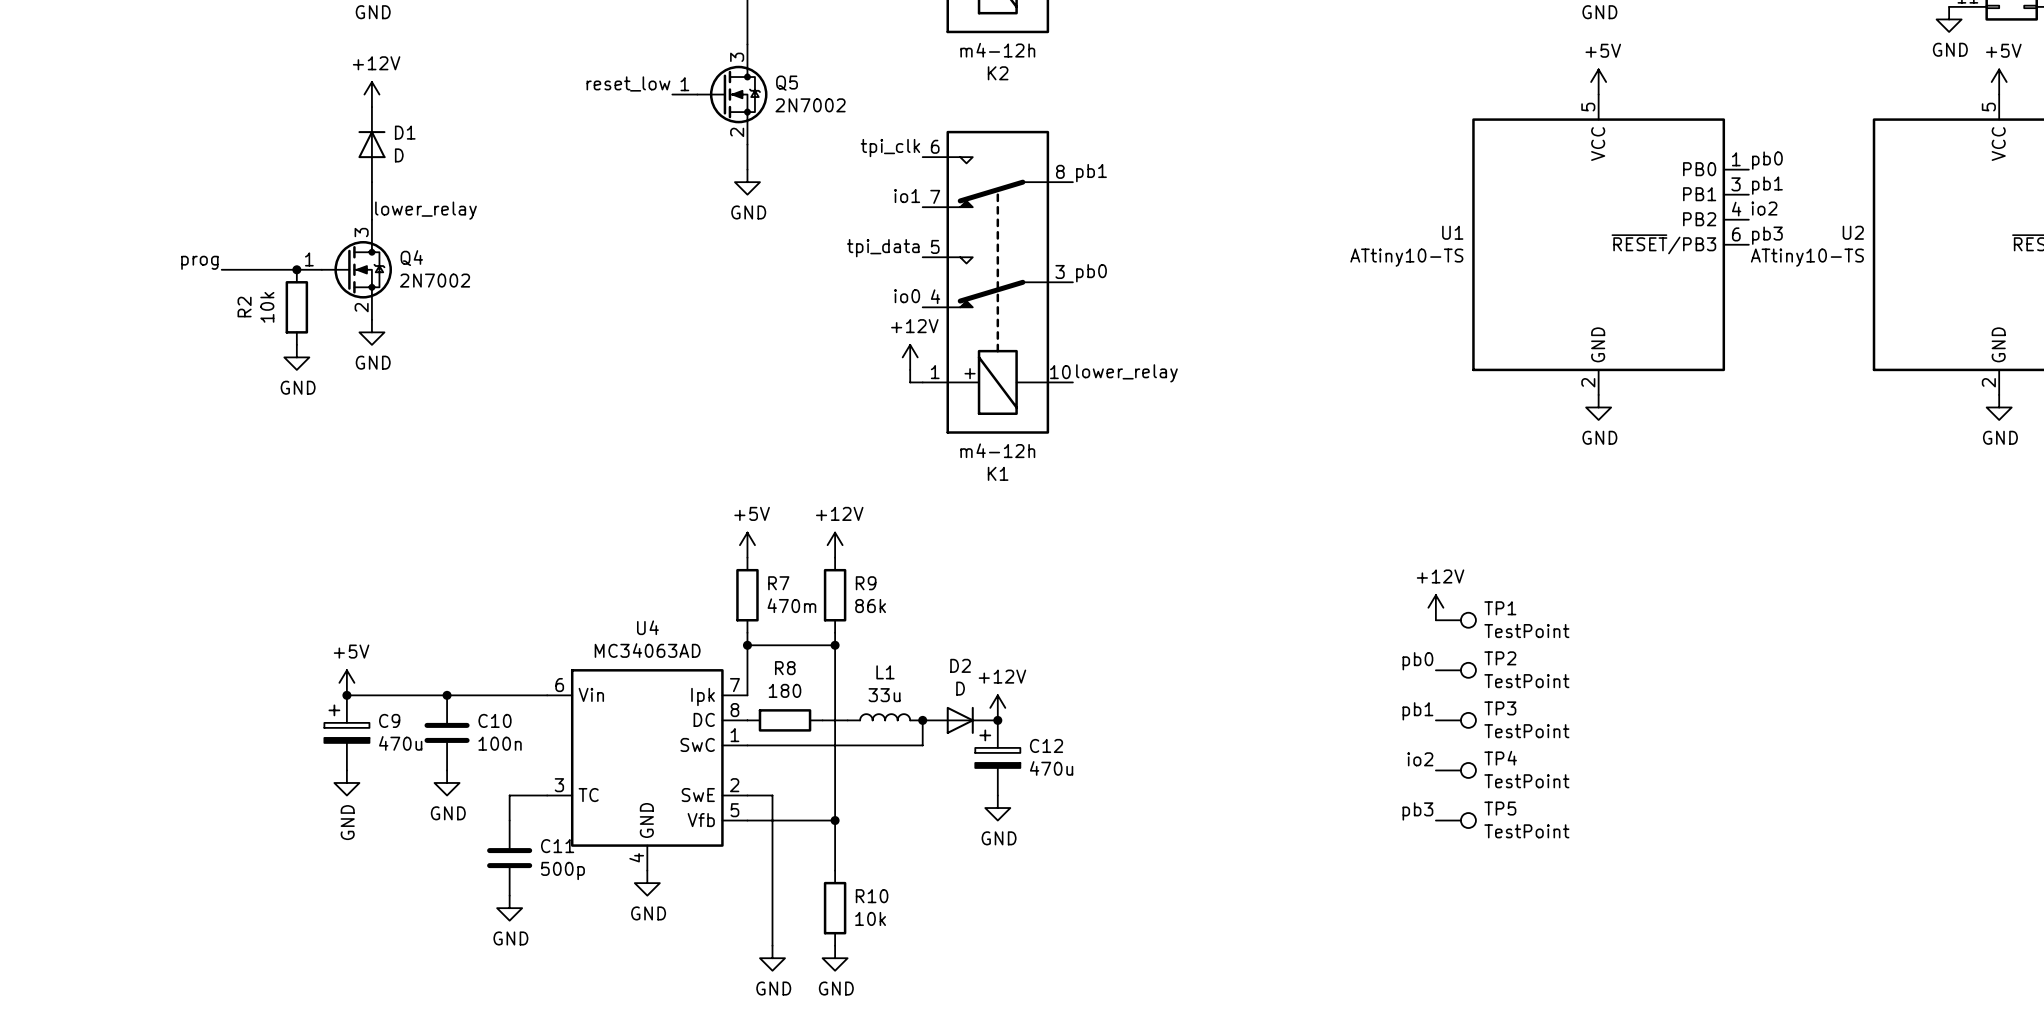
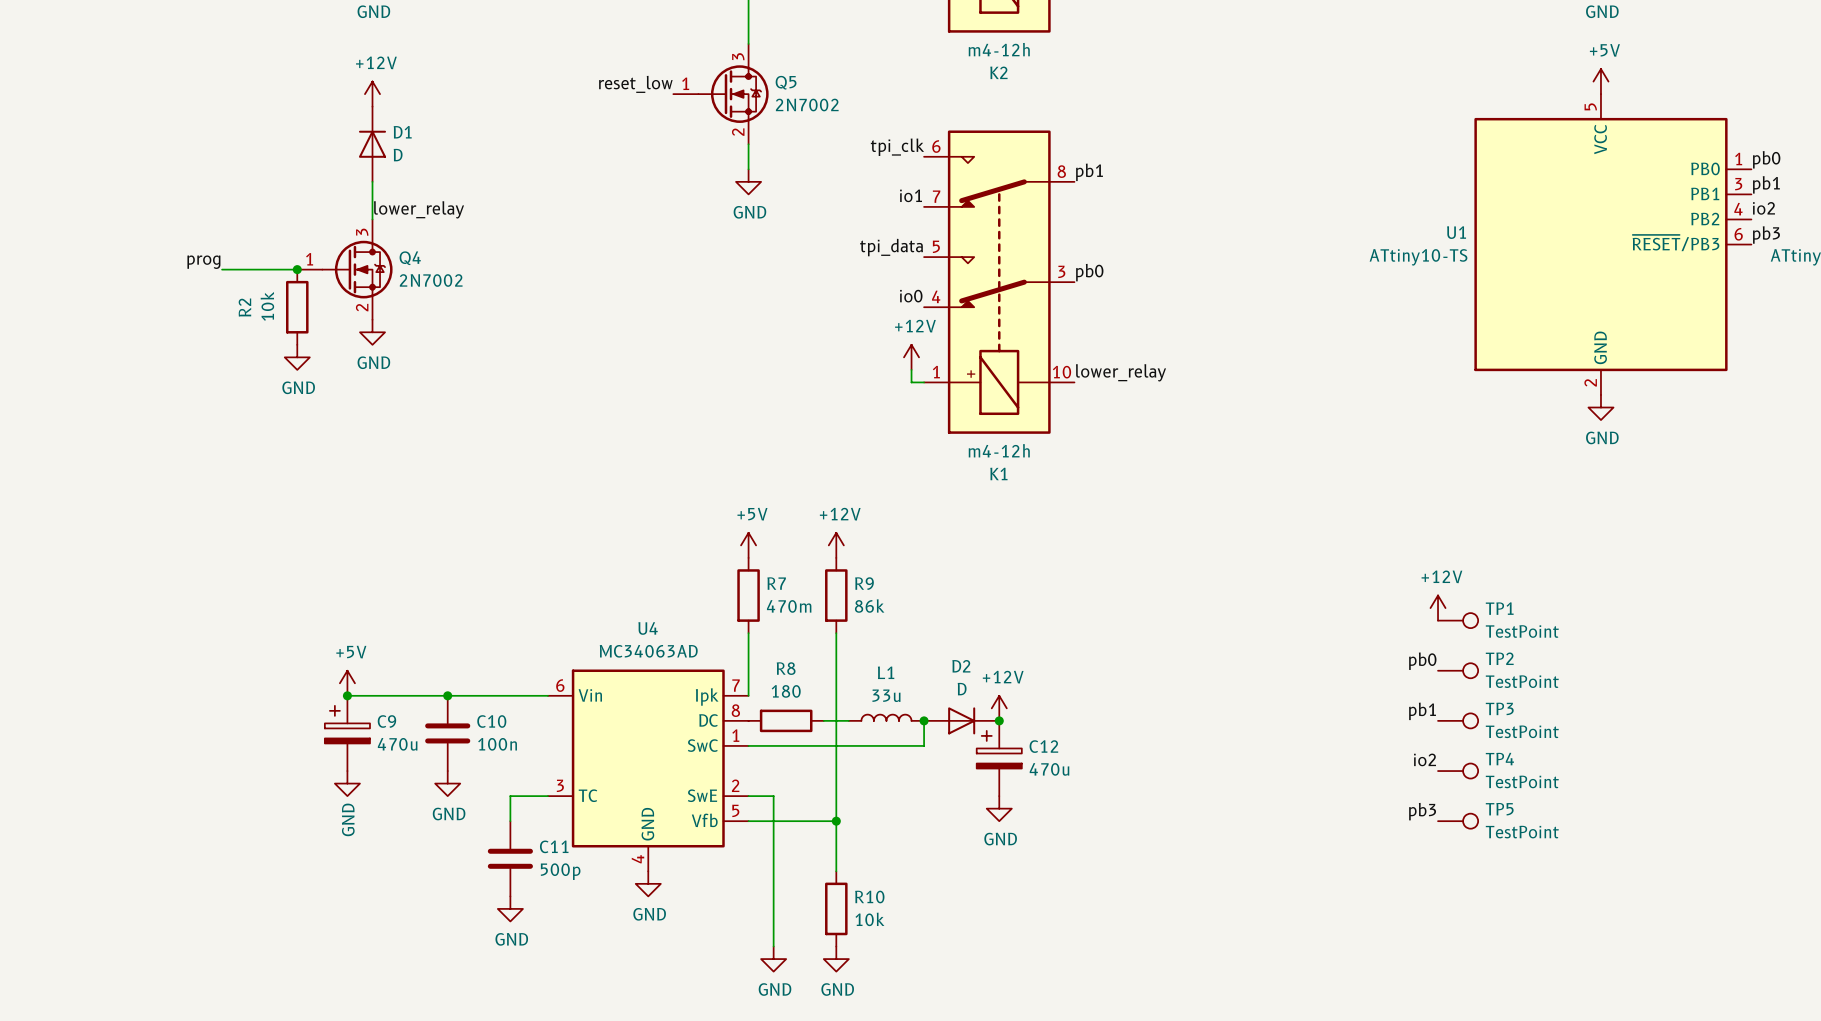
wire: (747, 645) (835, 645) -> none
junction: (747, 645) -> none
junction: (835, 645) -> none

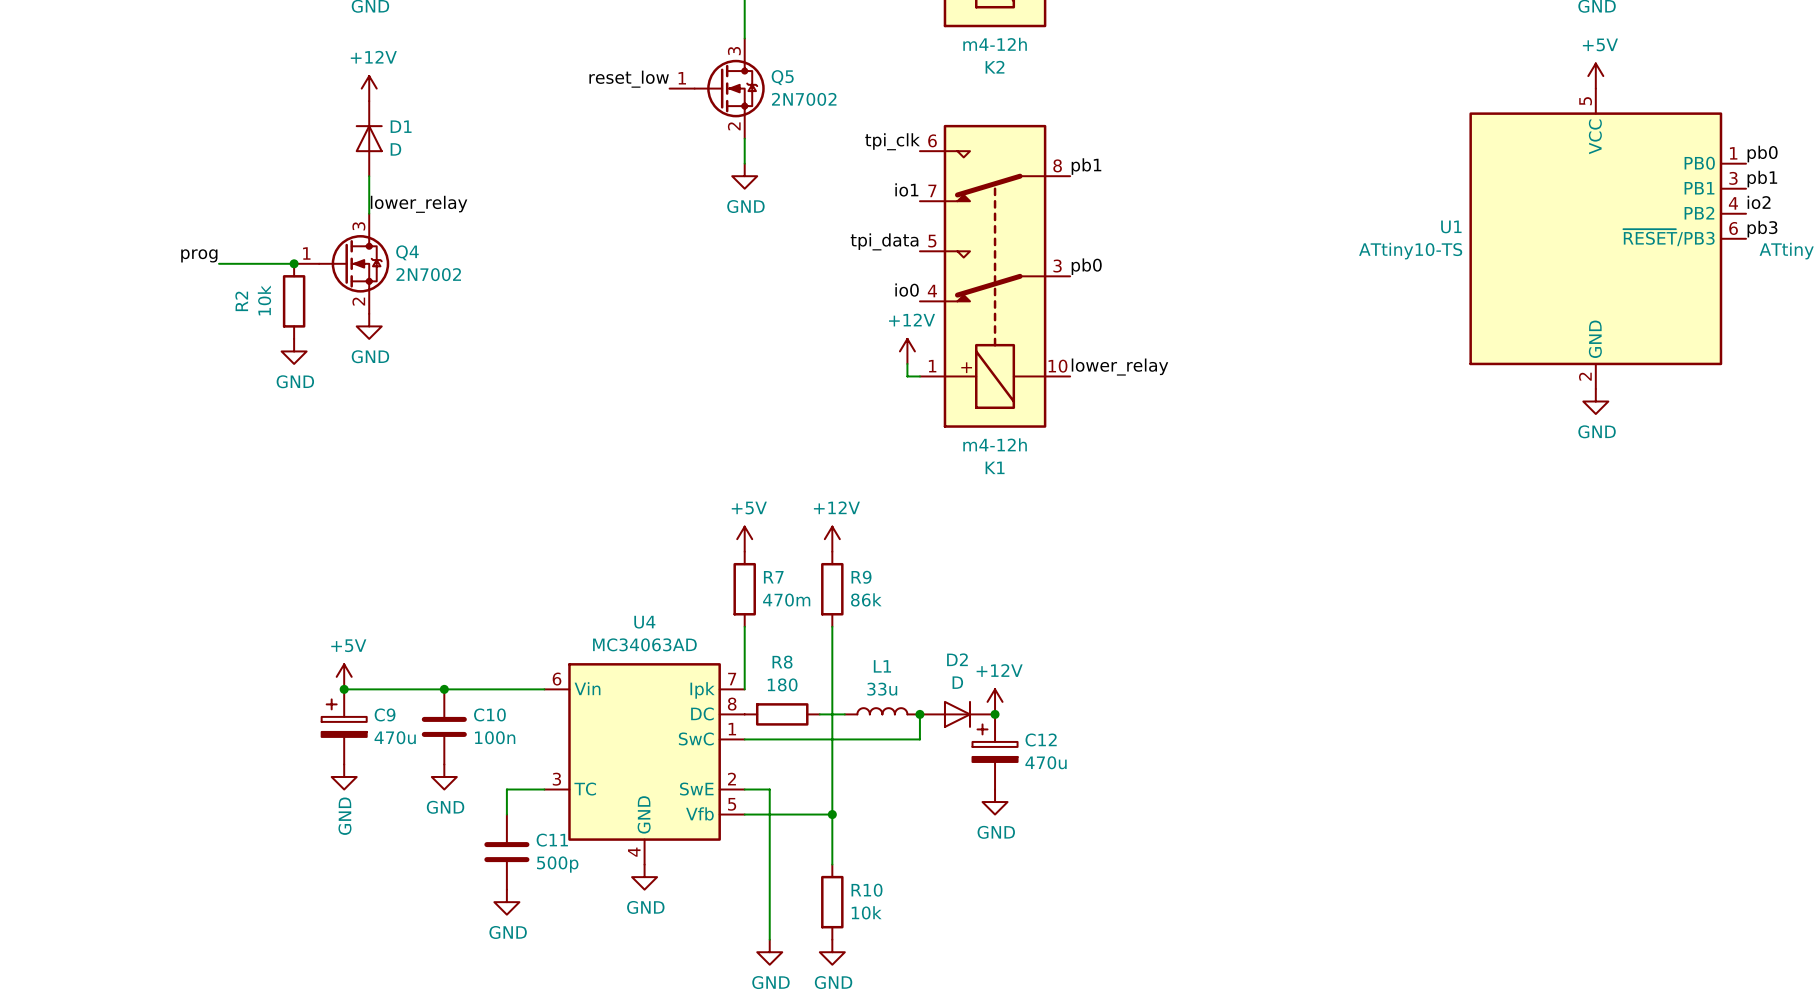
power symbol: +12V (1438, 608) -> none
TP1: TestPoint (1458, 620) -> none
label: pb0 (1422, 661) -> none
TP2: TestPoint (1458, 670) -> none
label: pb1 (1422, 711) -> none
TP3: TestPoint (1458, 720) -> none
label: io2 (1425, 759) -> none
TP4: TestPoint (1458, 771) -> none
label: pb3 (1422, 811) -> none
TP5: TestPoint (1458, 821) -> none

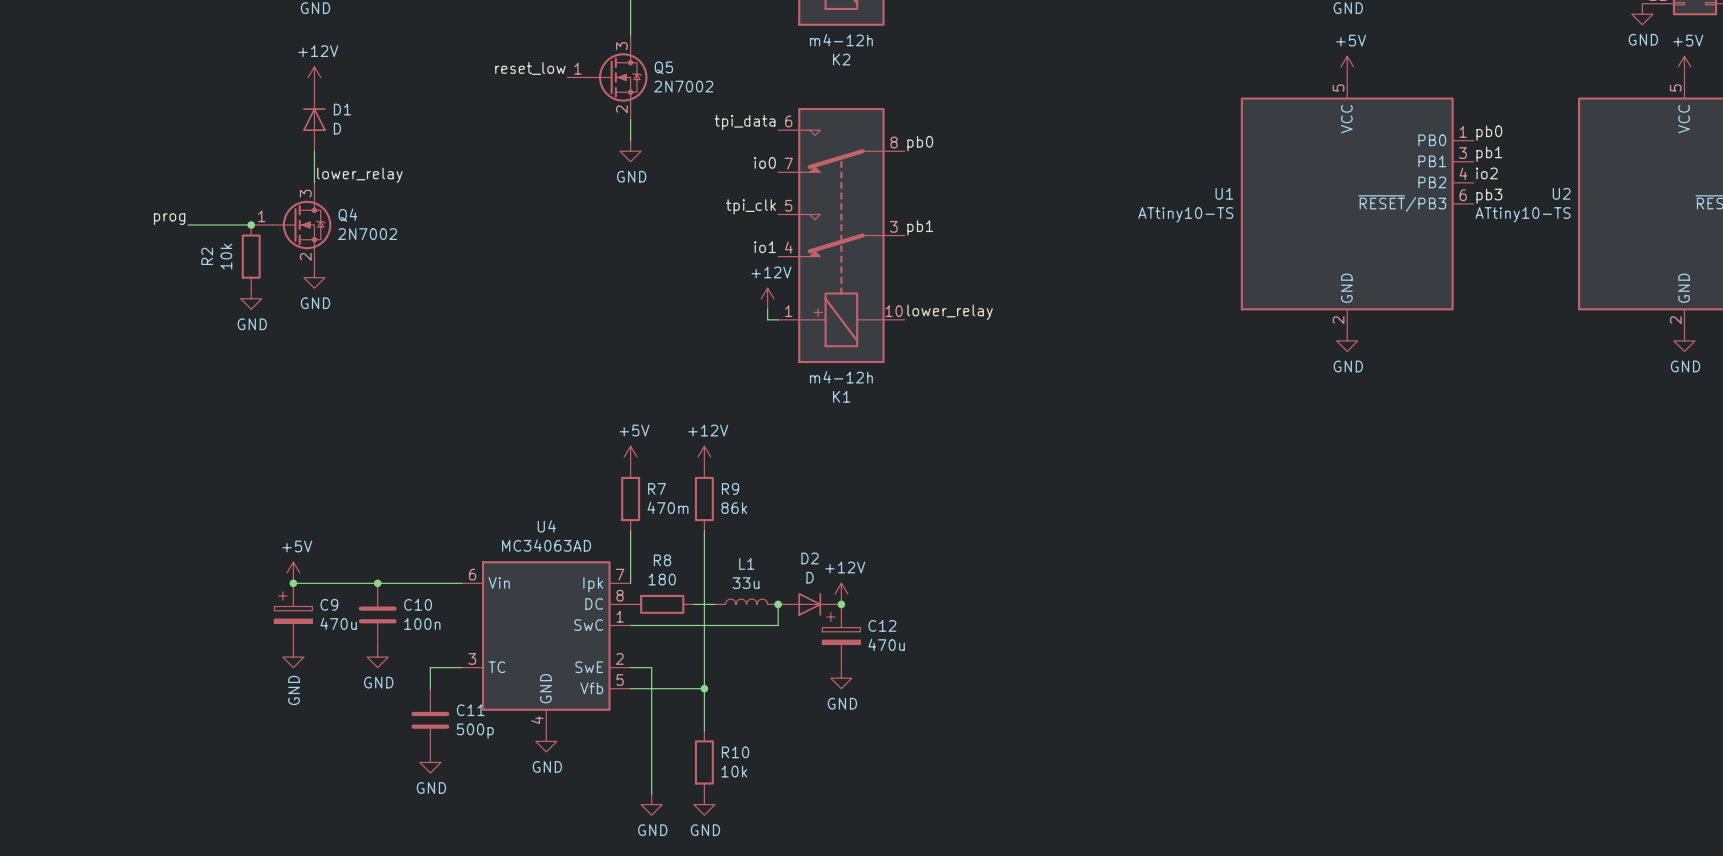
label: tpi_clk (892, 141) -> tpi_data (744, 122)
label: pb1 (1086, 166) -> pb0 (920, 143)
label: io1 (906, 189) -> io0 (765, 162)
label: tpi_data (884, 241) -> tpi_clk (750, 206)
label: pb0 (1086, 266) -> pb1 (920, 227)
label: io0 (907, 290) -> io1 (765, 247)

